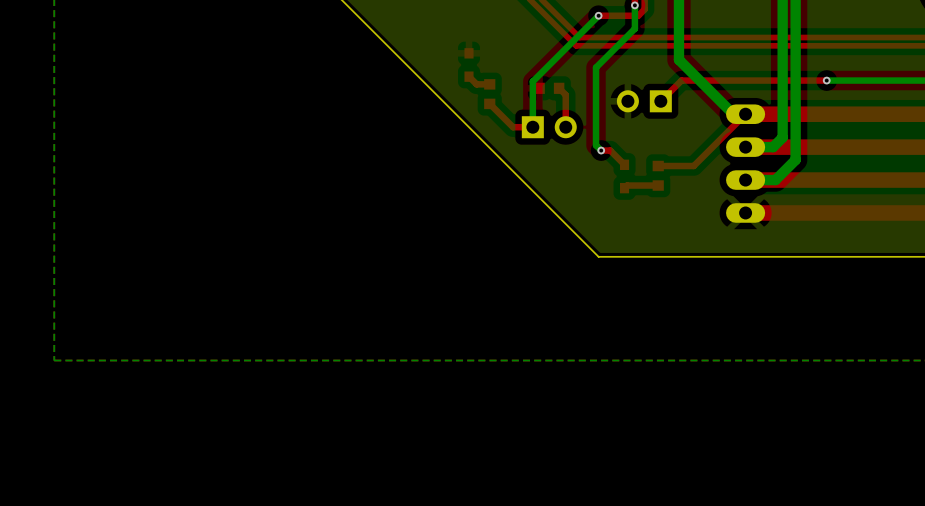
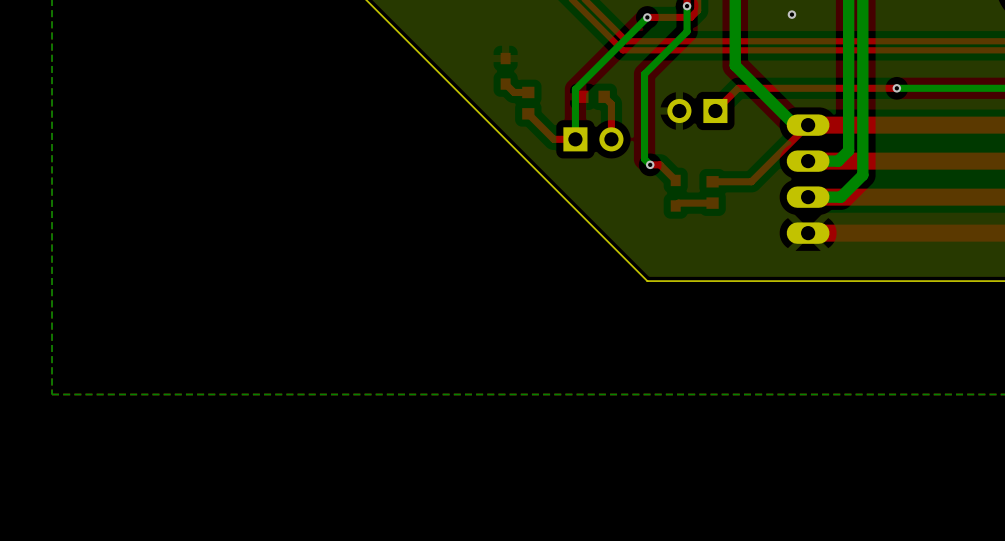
via: none -> (791, 14)

